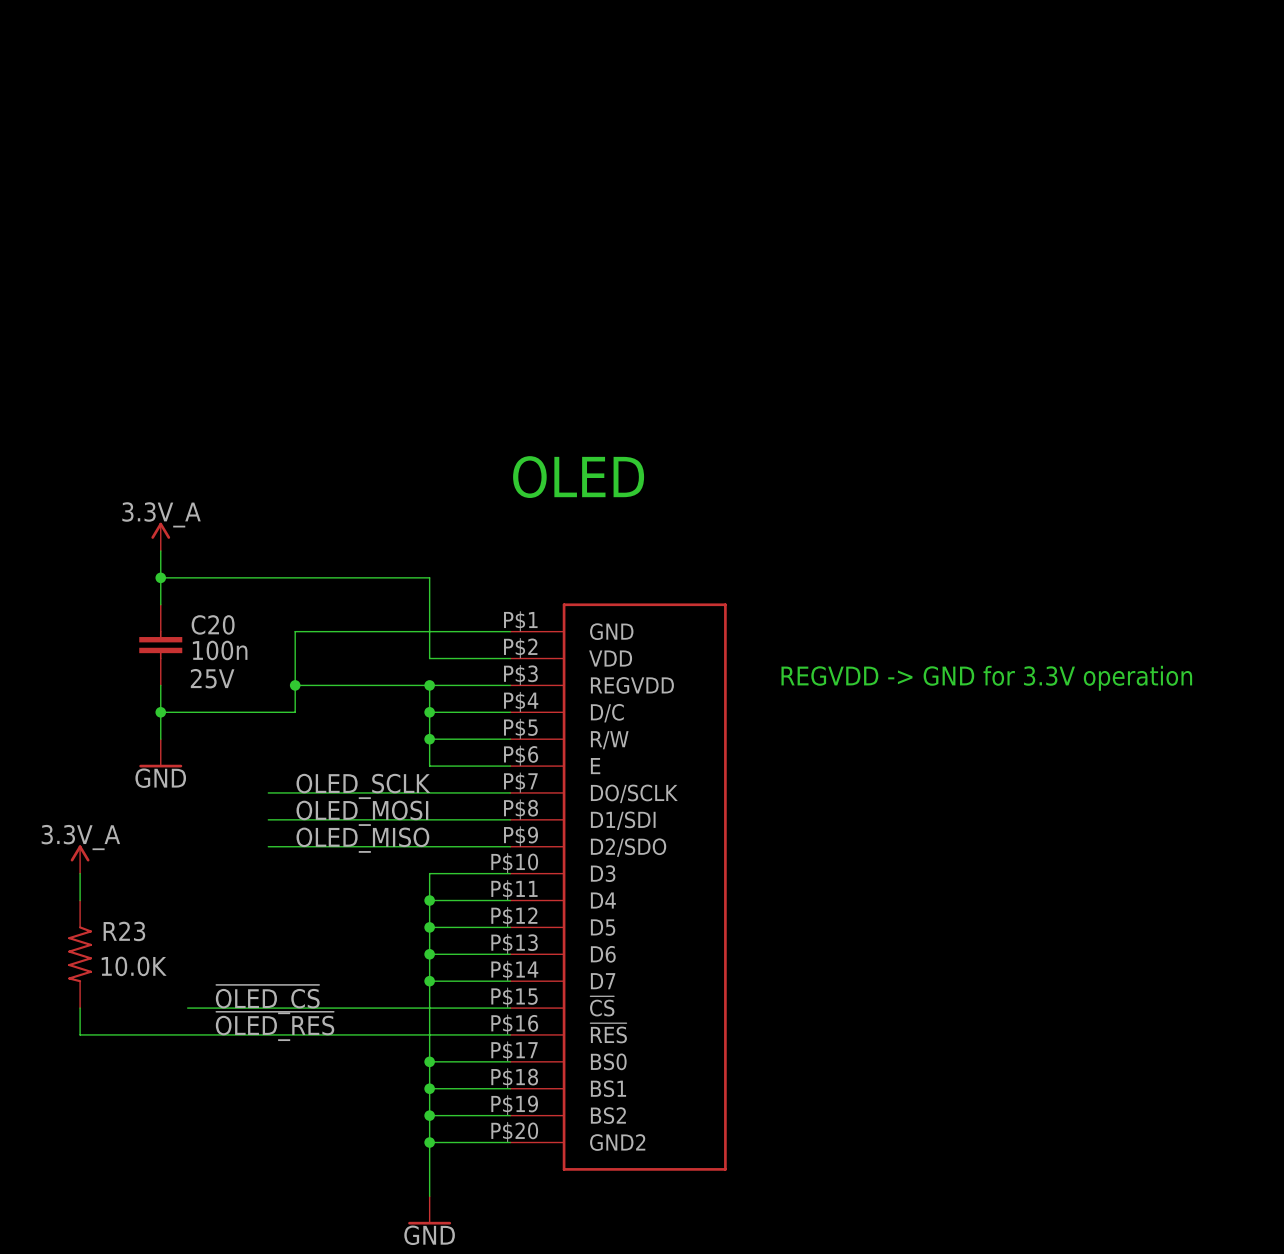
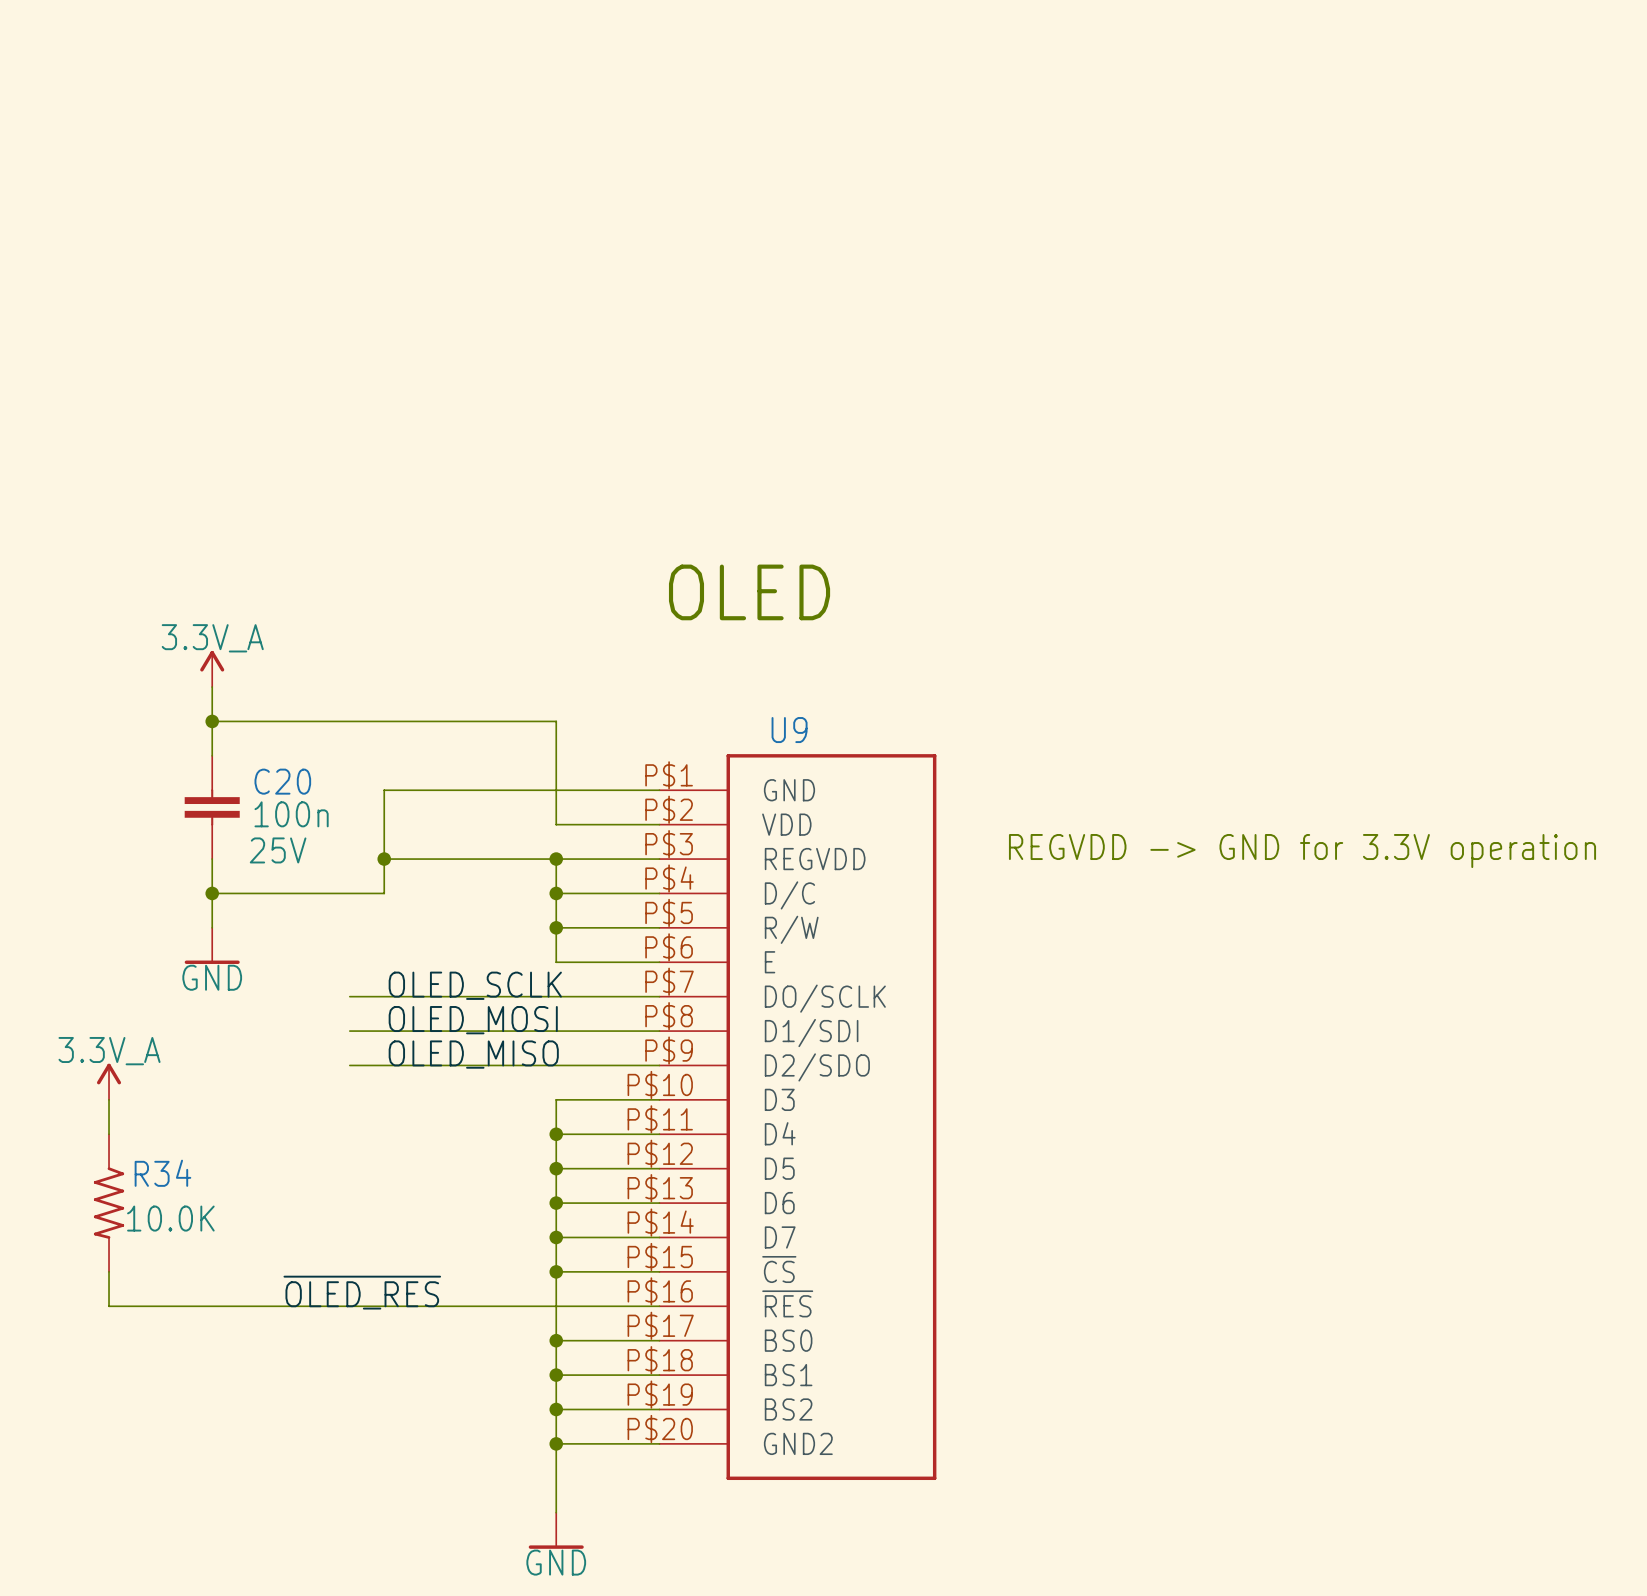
U9 name: none -> U9 (789, 730)
R23 name: R23 (124, 931) -> R34 (162, 1173)
label: ~{OLED_CS} (267, 999) -> none
wire: (187, 1008) (429, 1008) -> none
junction: none -> (556, 1271)

